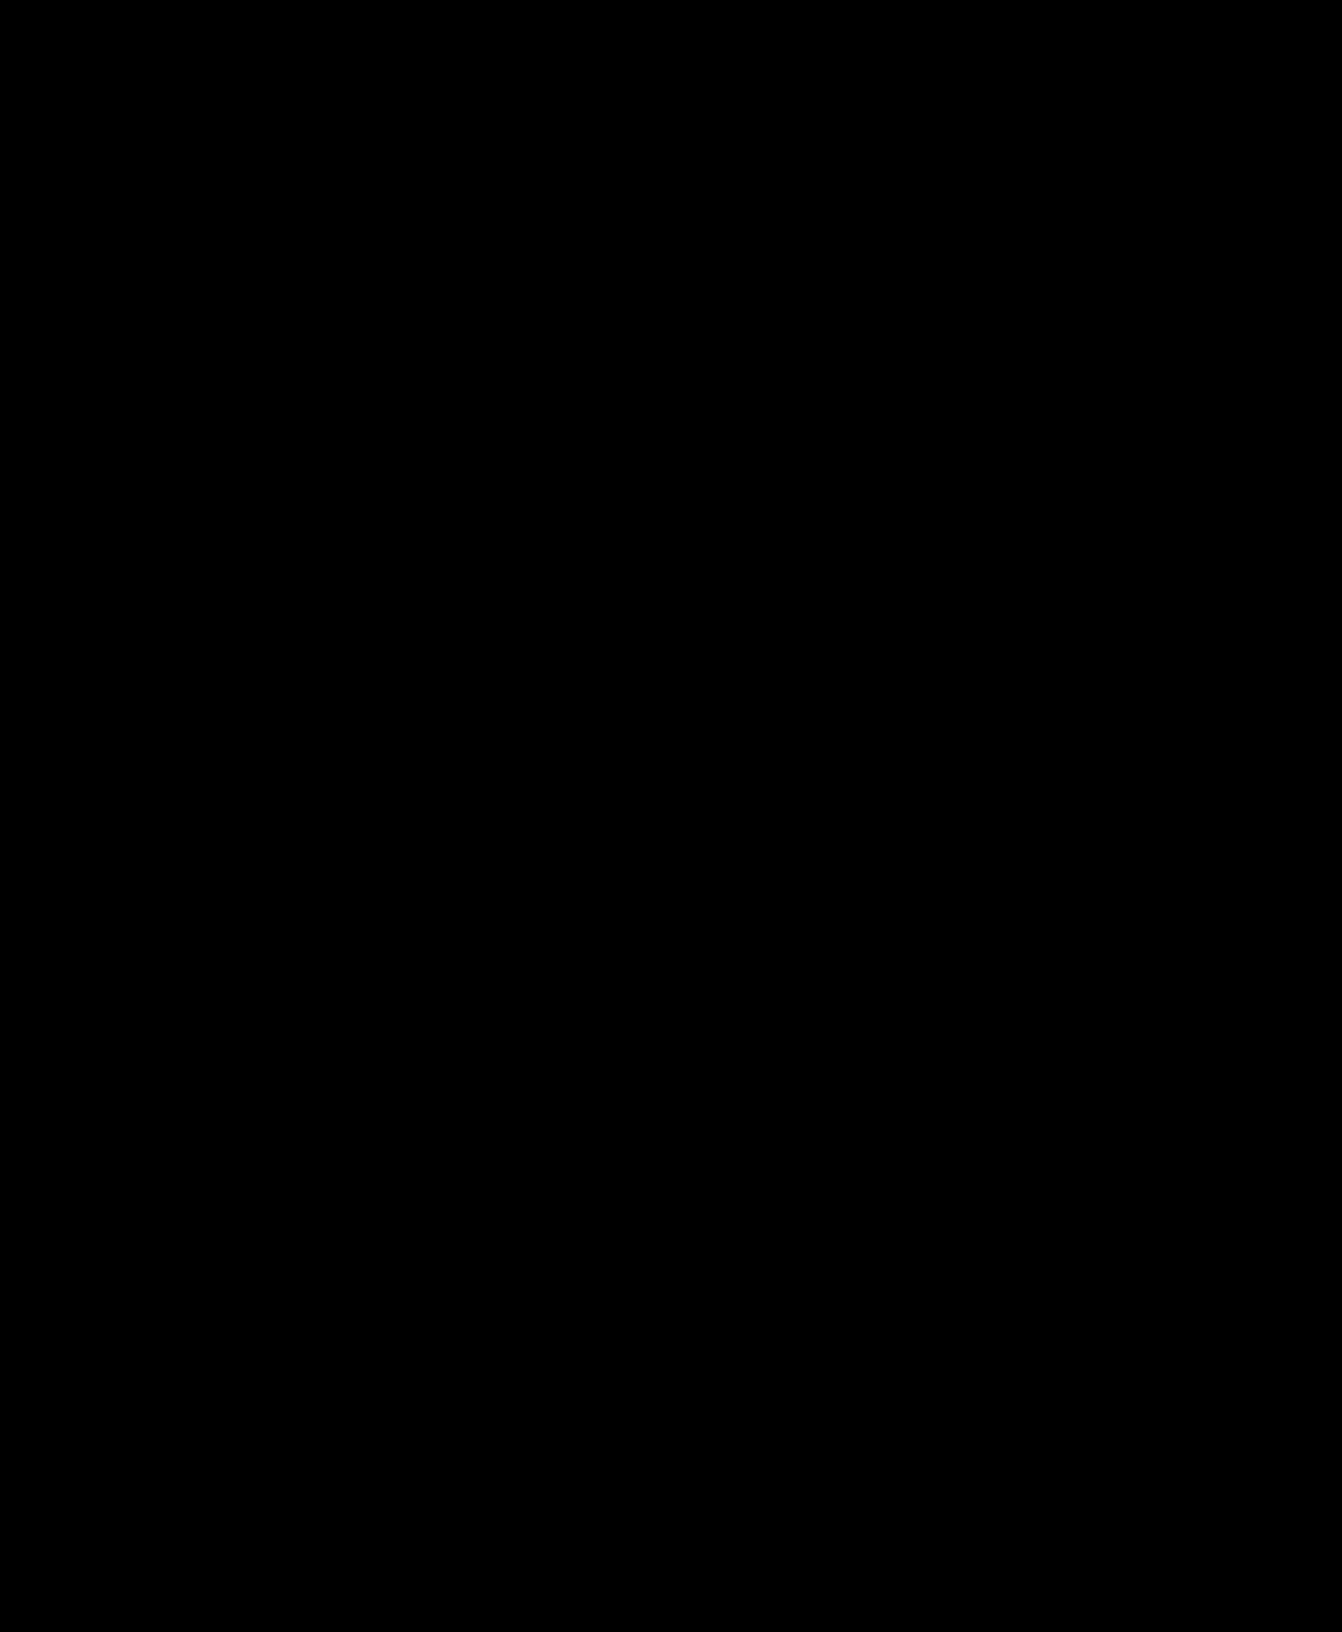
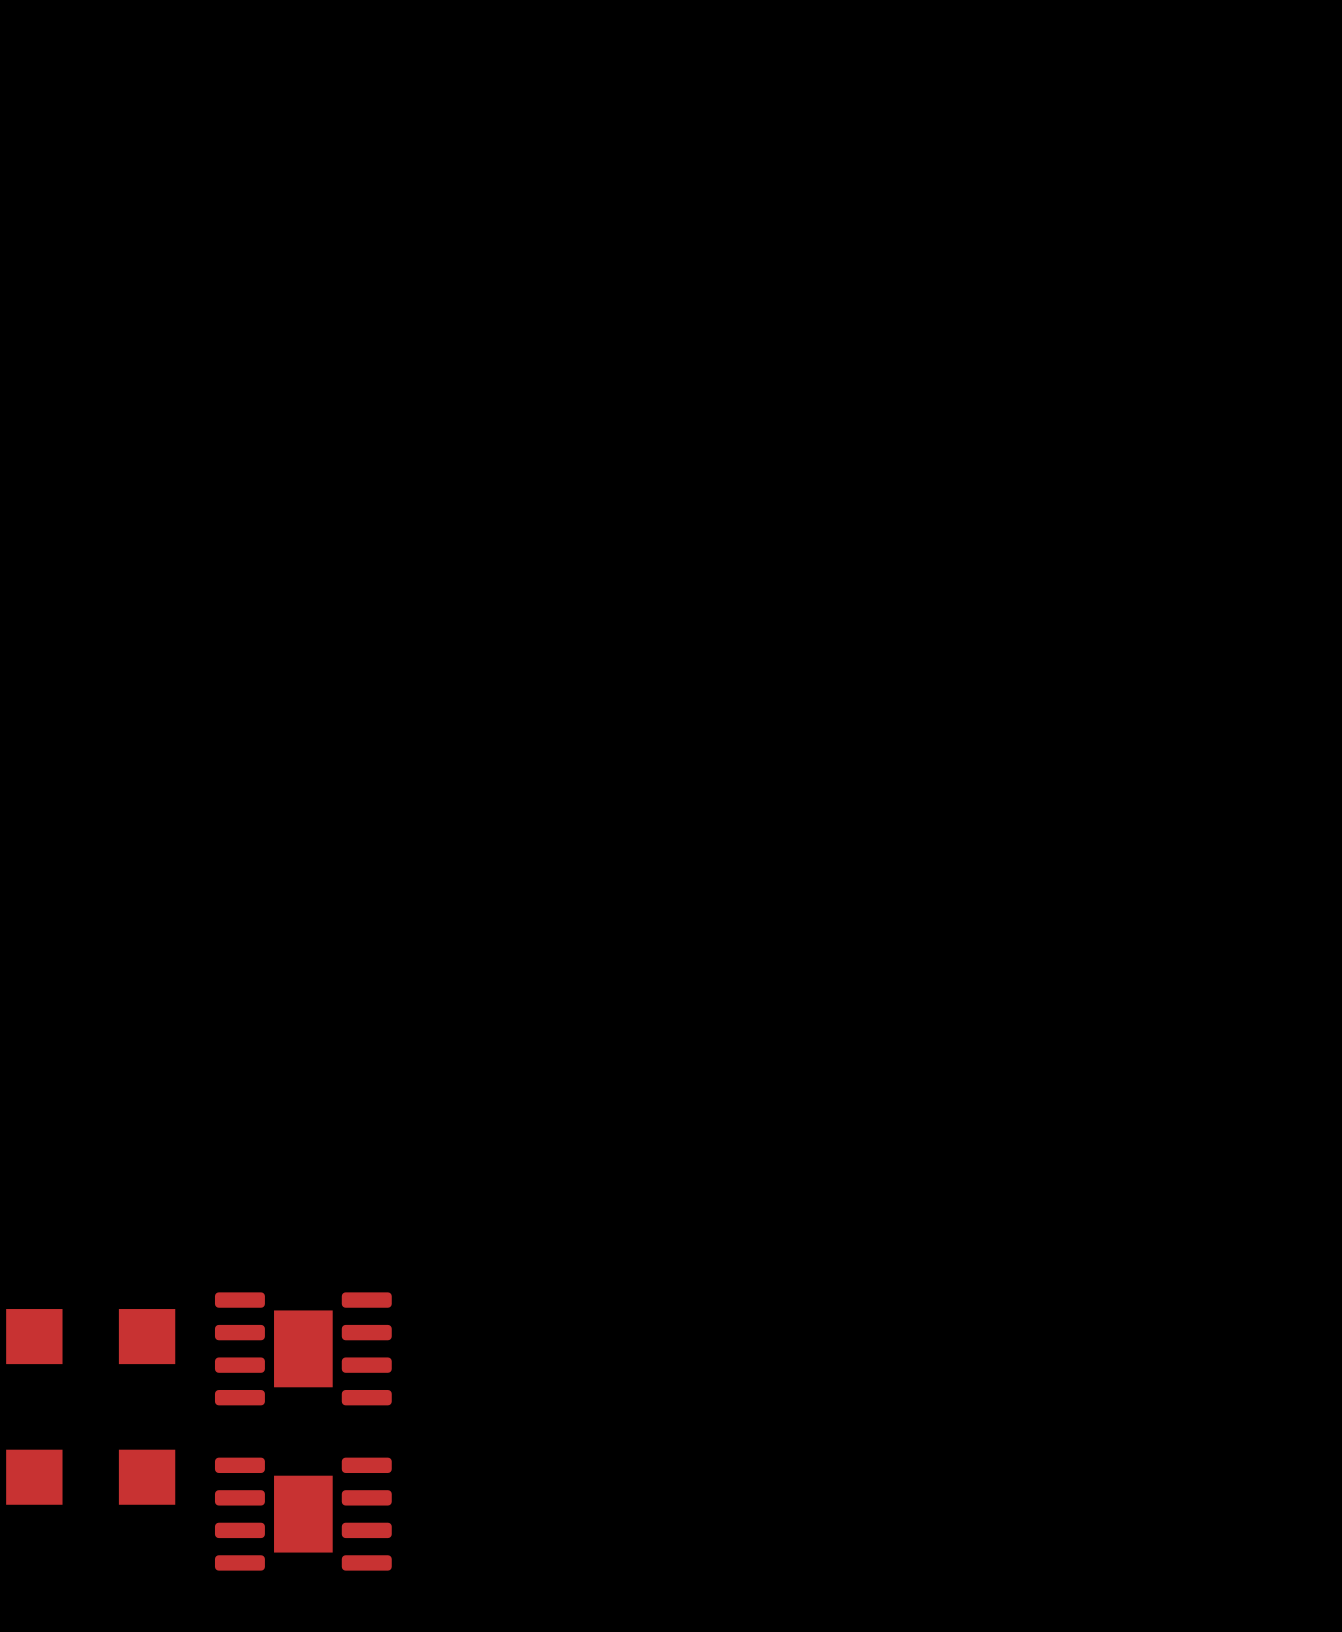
part: none -> (90, 1336)
part: none -> (303, 1348)
part: none -> (90, 1477)
part: none -> (303, 1514)

